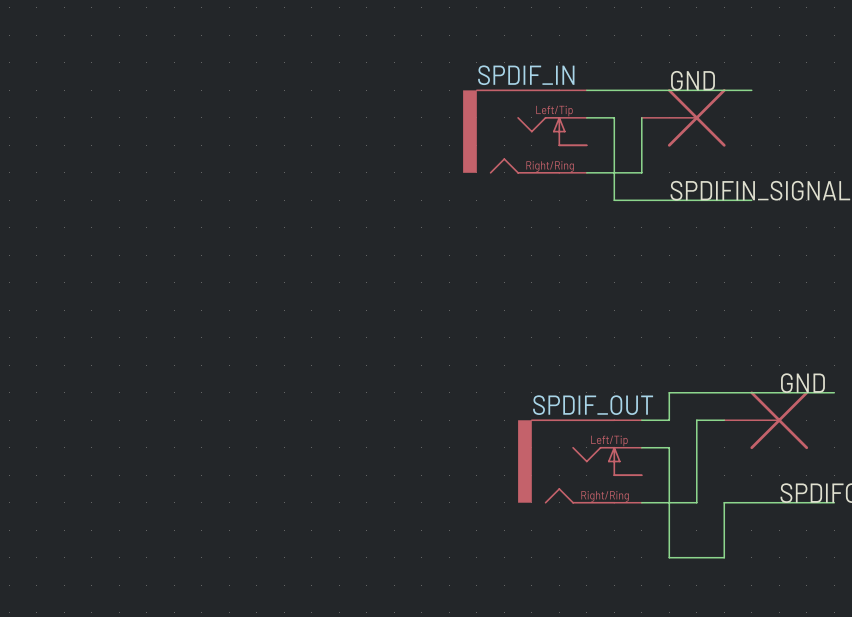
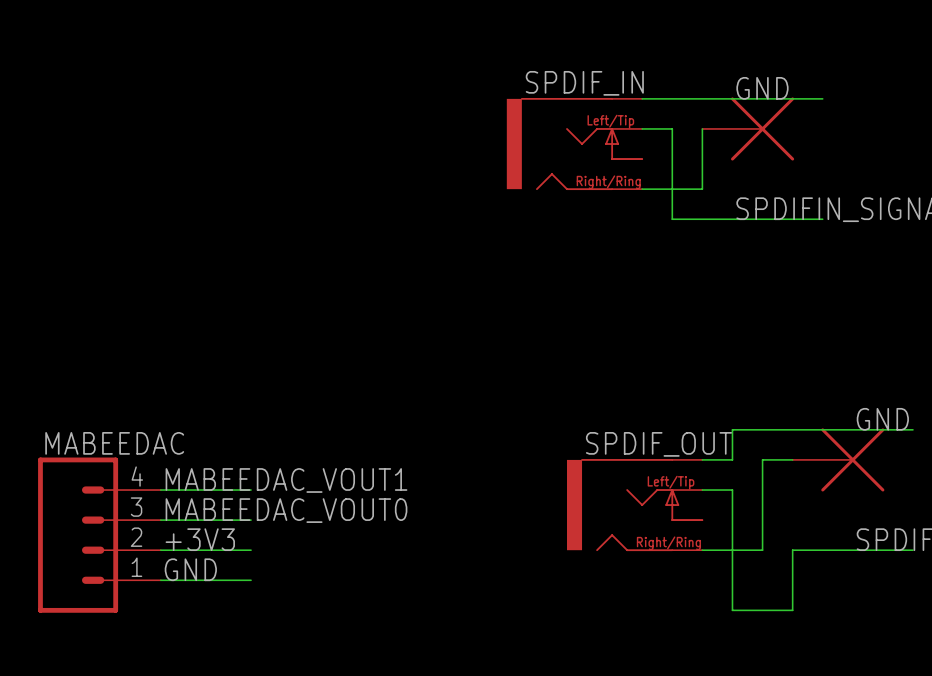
label: none -> MABEEDAC_VOUT1 (286, 480)
wire: none -> (160, 490) (251, 490)
label: none -> MABEEDAC_VOUT0 (286, 510)
wire: none -> (160, 520) (251, 520)
MABEEDAC: none -> (99, 535)
label: none -> +3V3 (200, 539)
wire: none -> (160, 550) (251, 550)
label: none -> GND (190, 569)
wire: none -> (160, 580) (251, 580)

